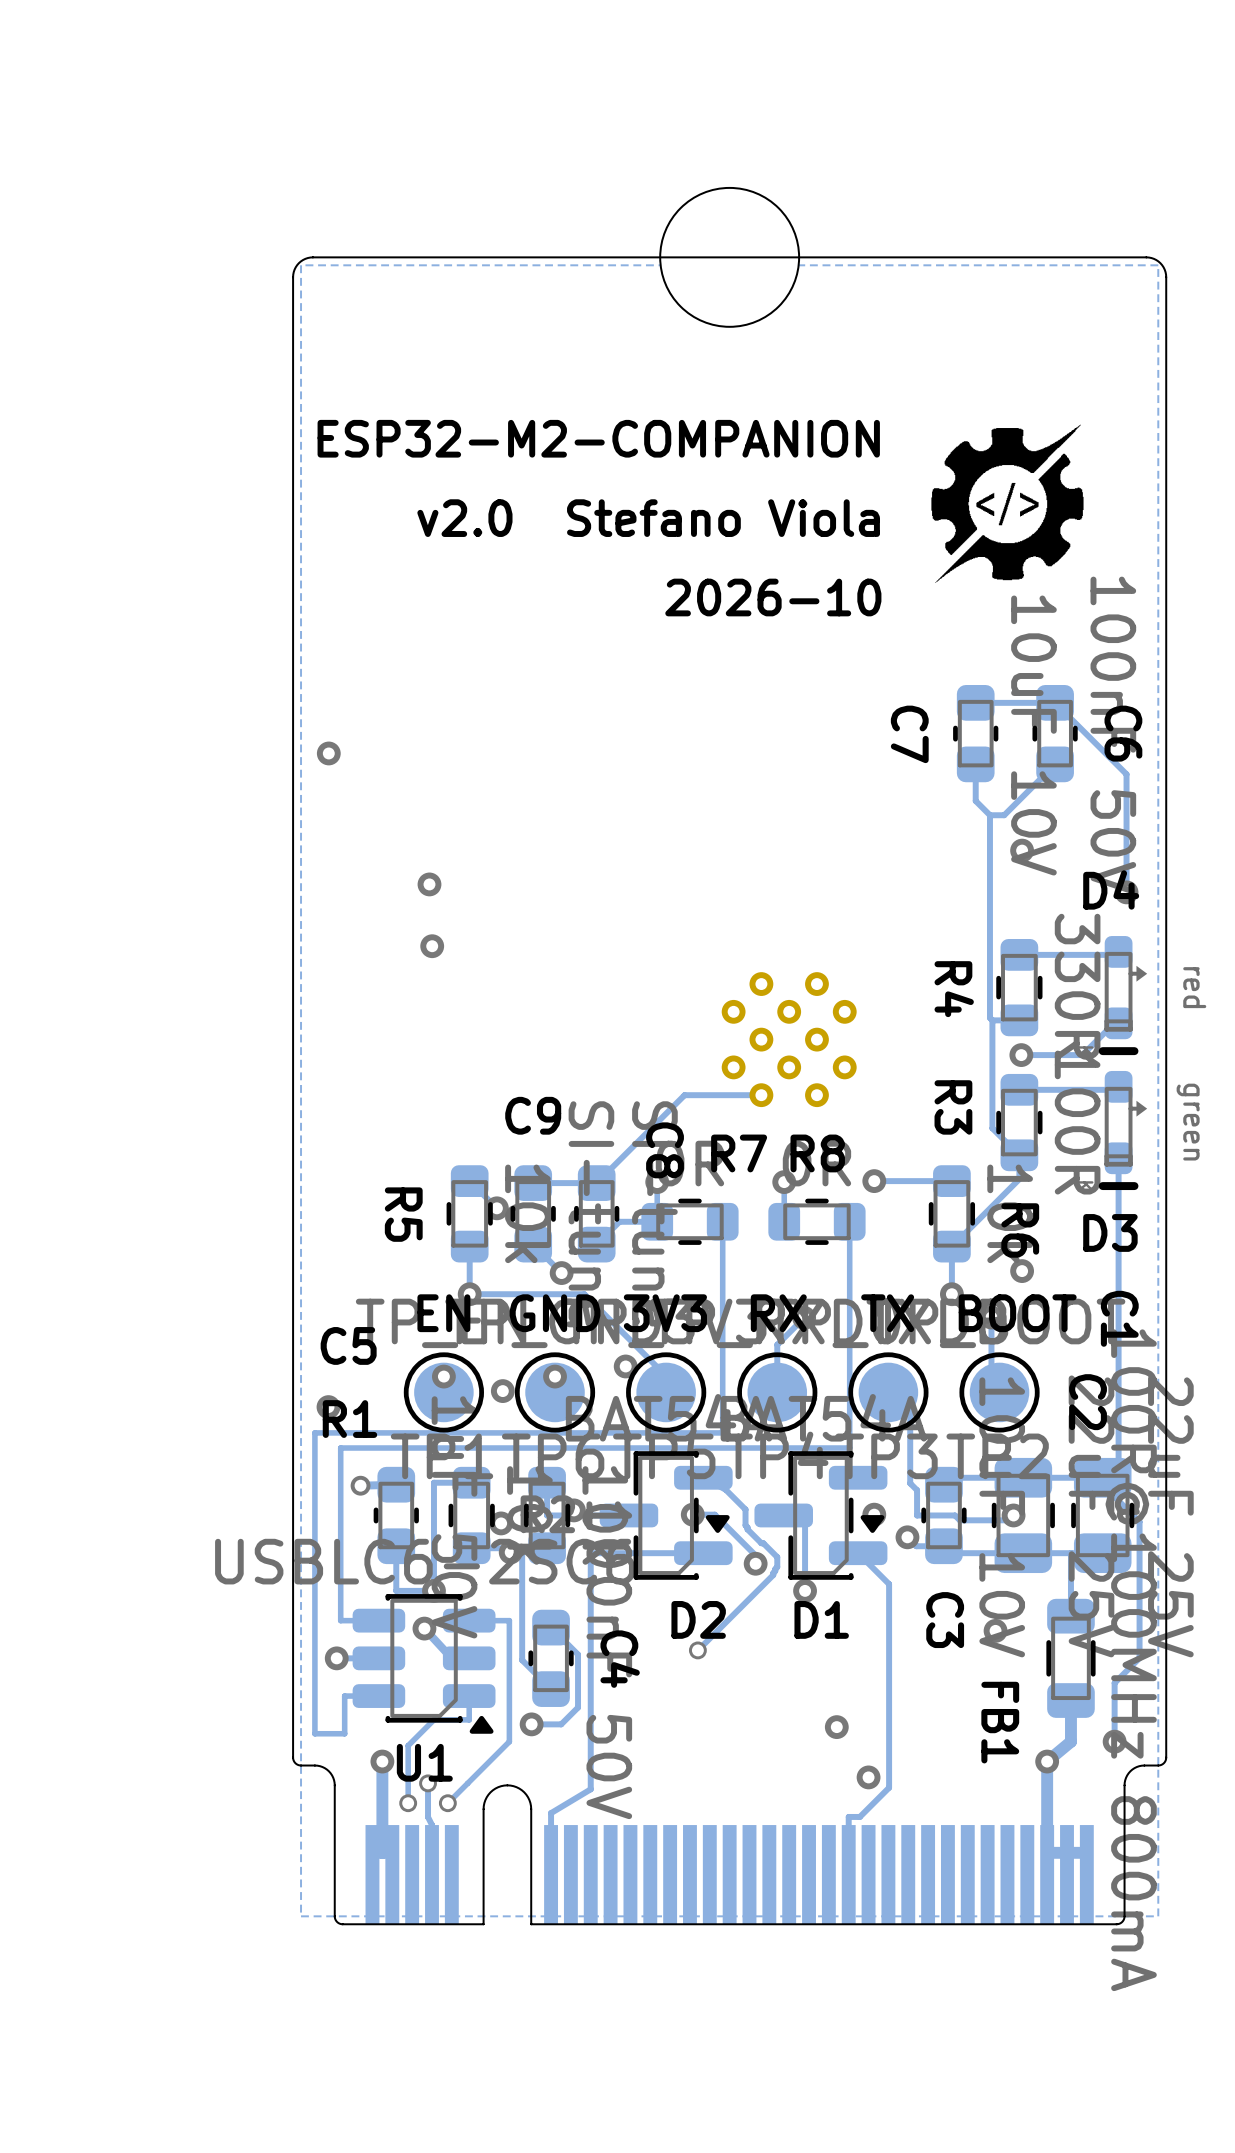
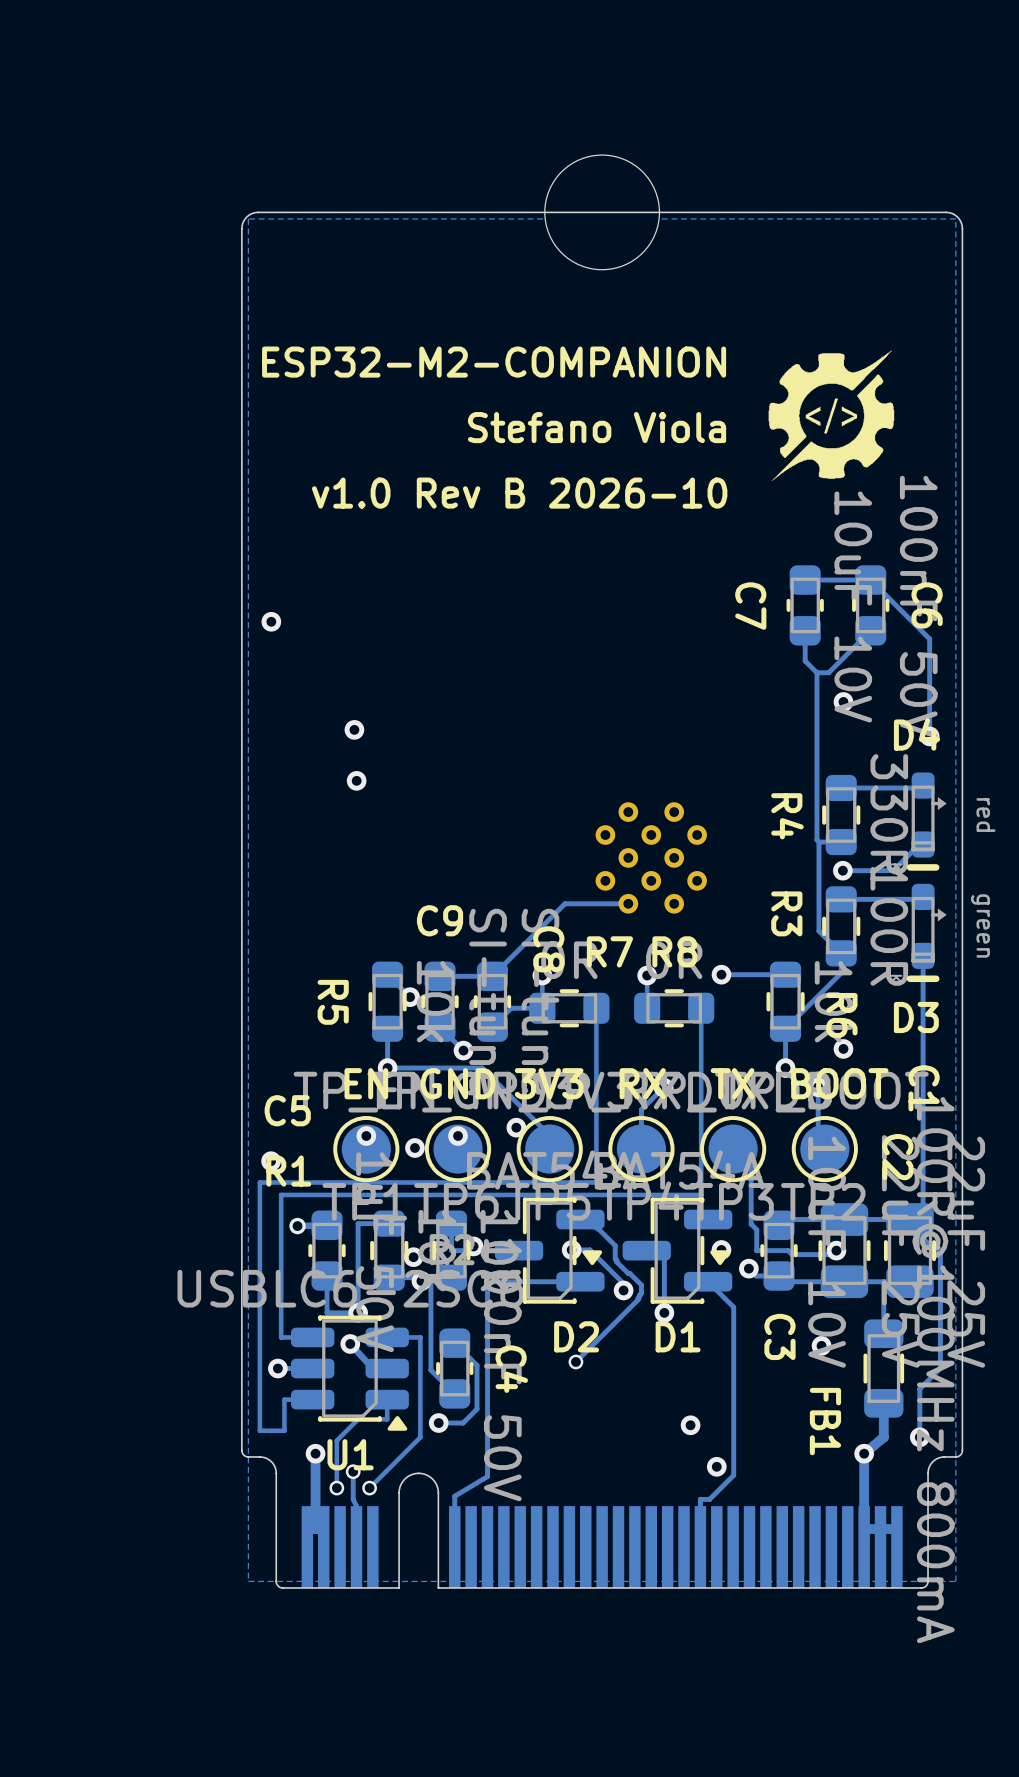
text: v2.0 Stefano Viola (648, 518) -> Stefano Viola (597, 427)
text: 2026-10 (773, 597) -> v1.0 Rev B 2026-10 (519, 493)

